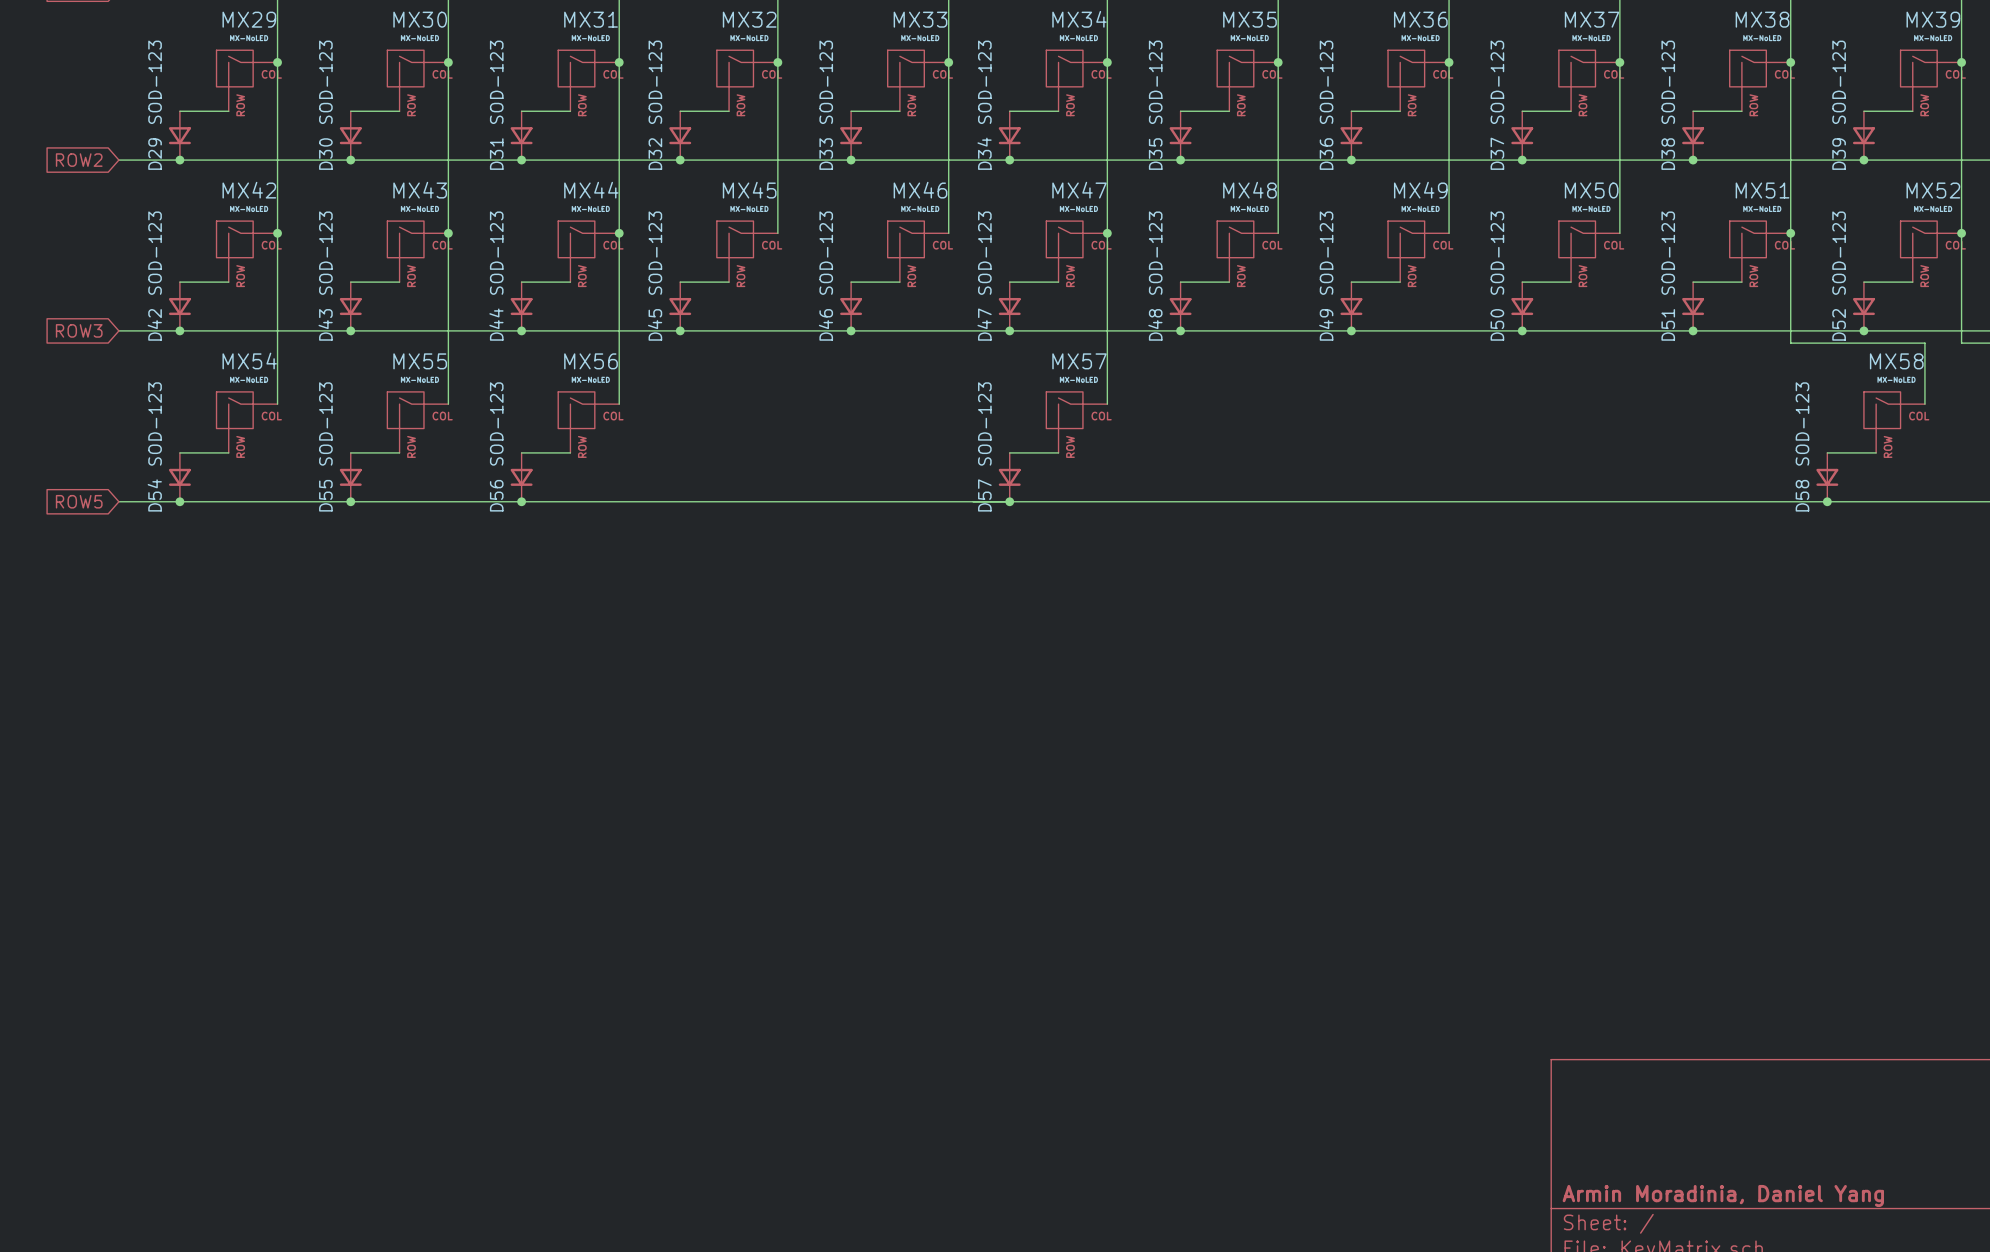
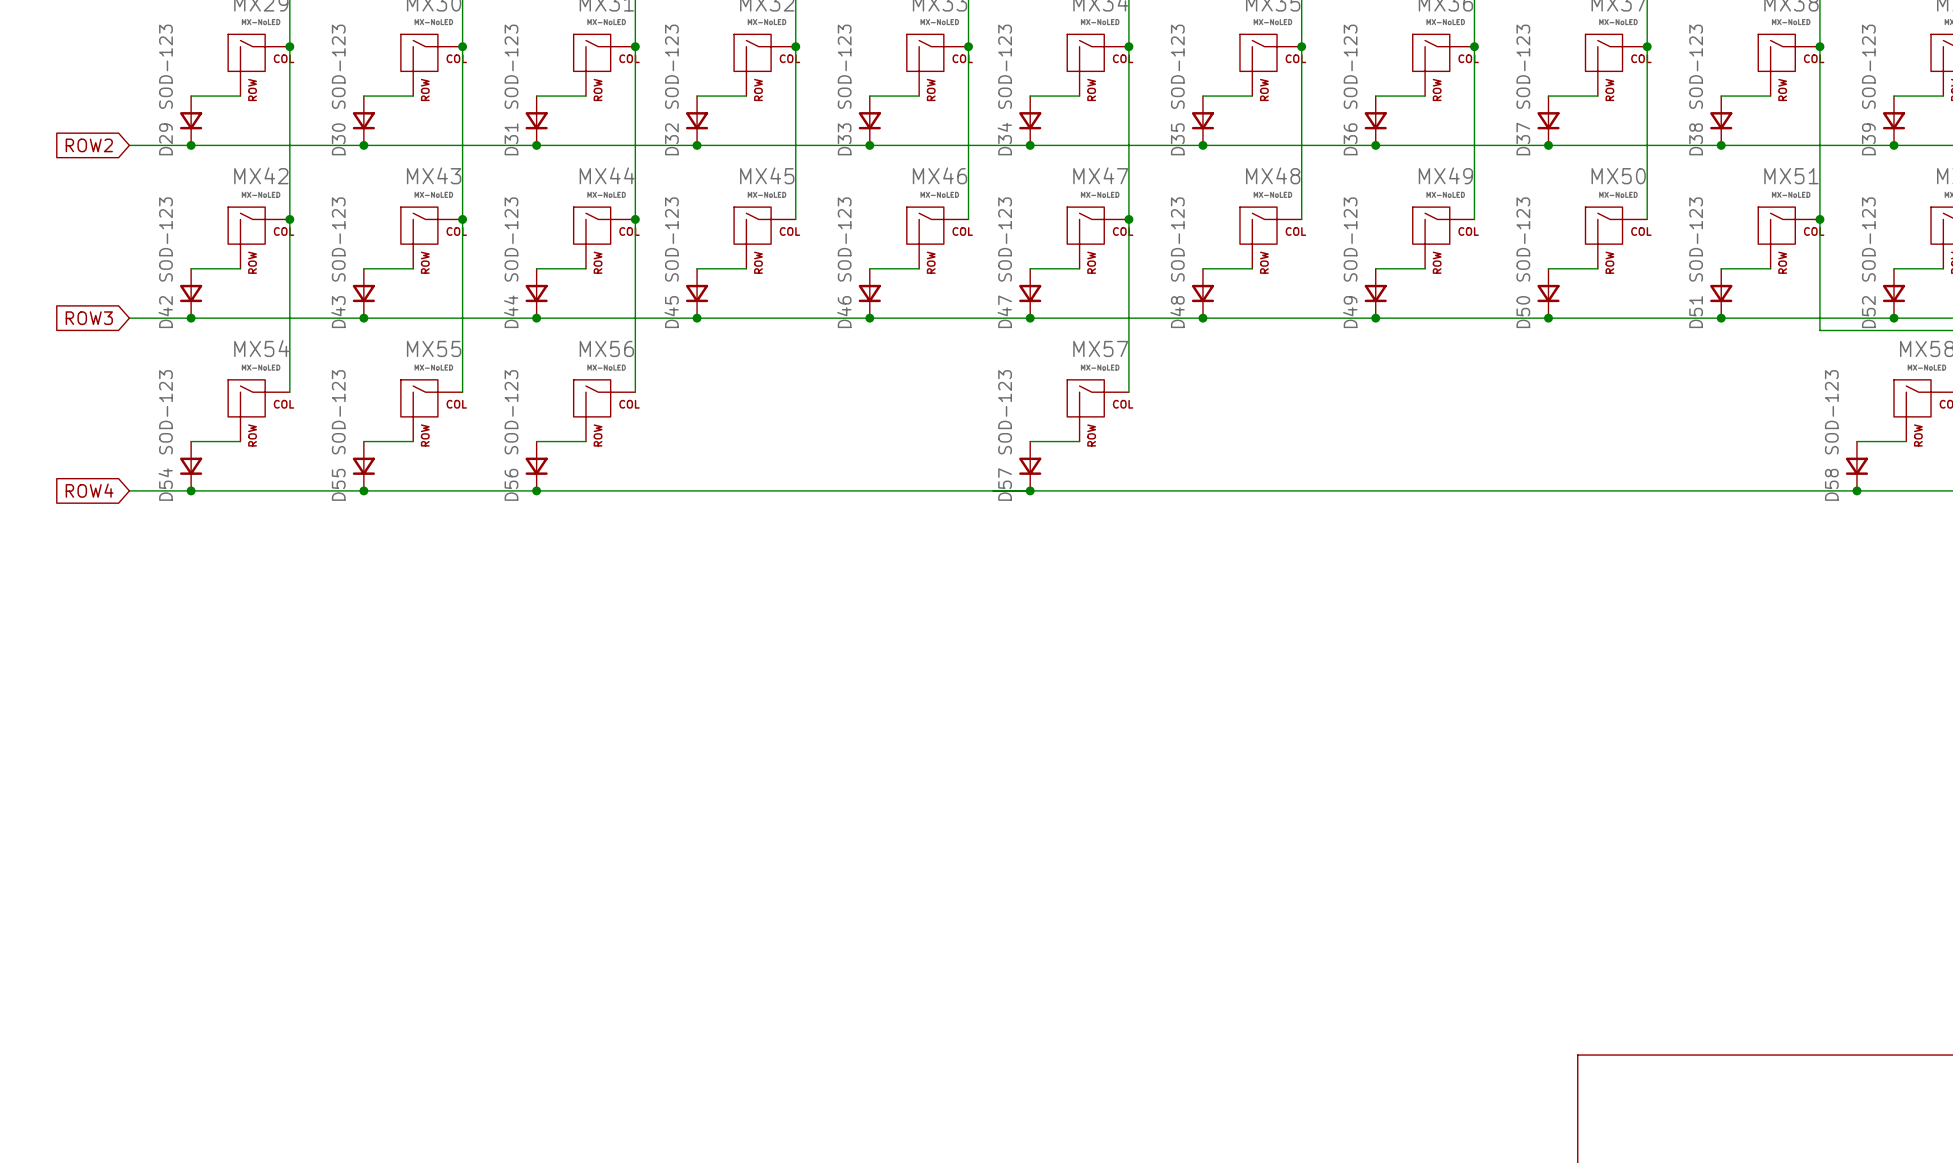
global label: ROW5 (79, 501) -> ROW4 (89, 490)

